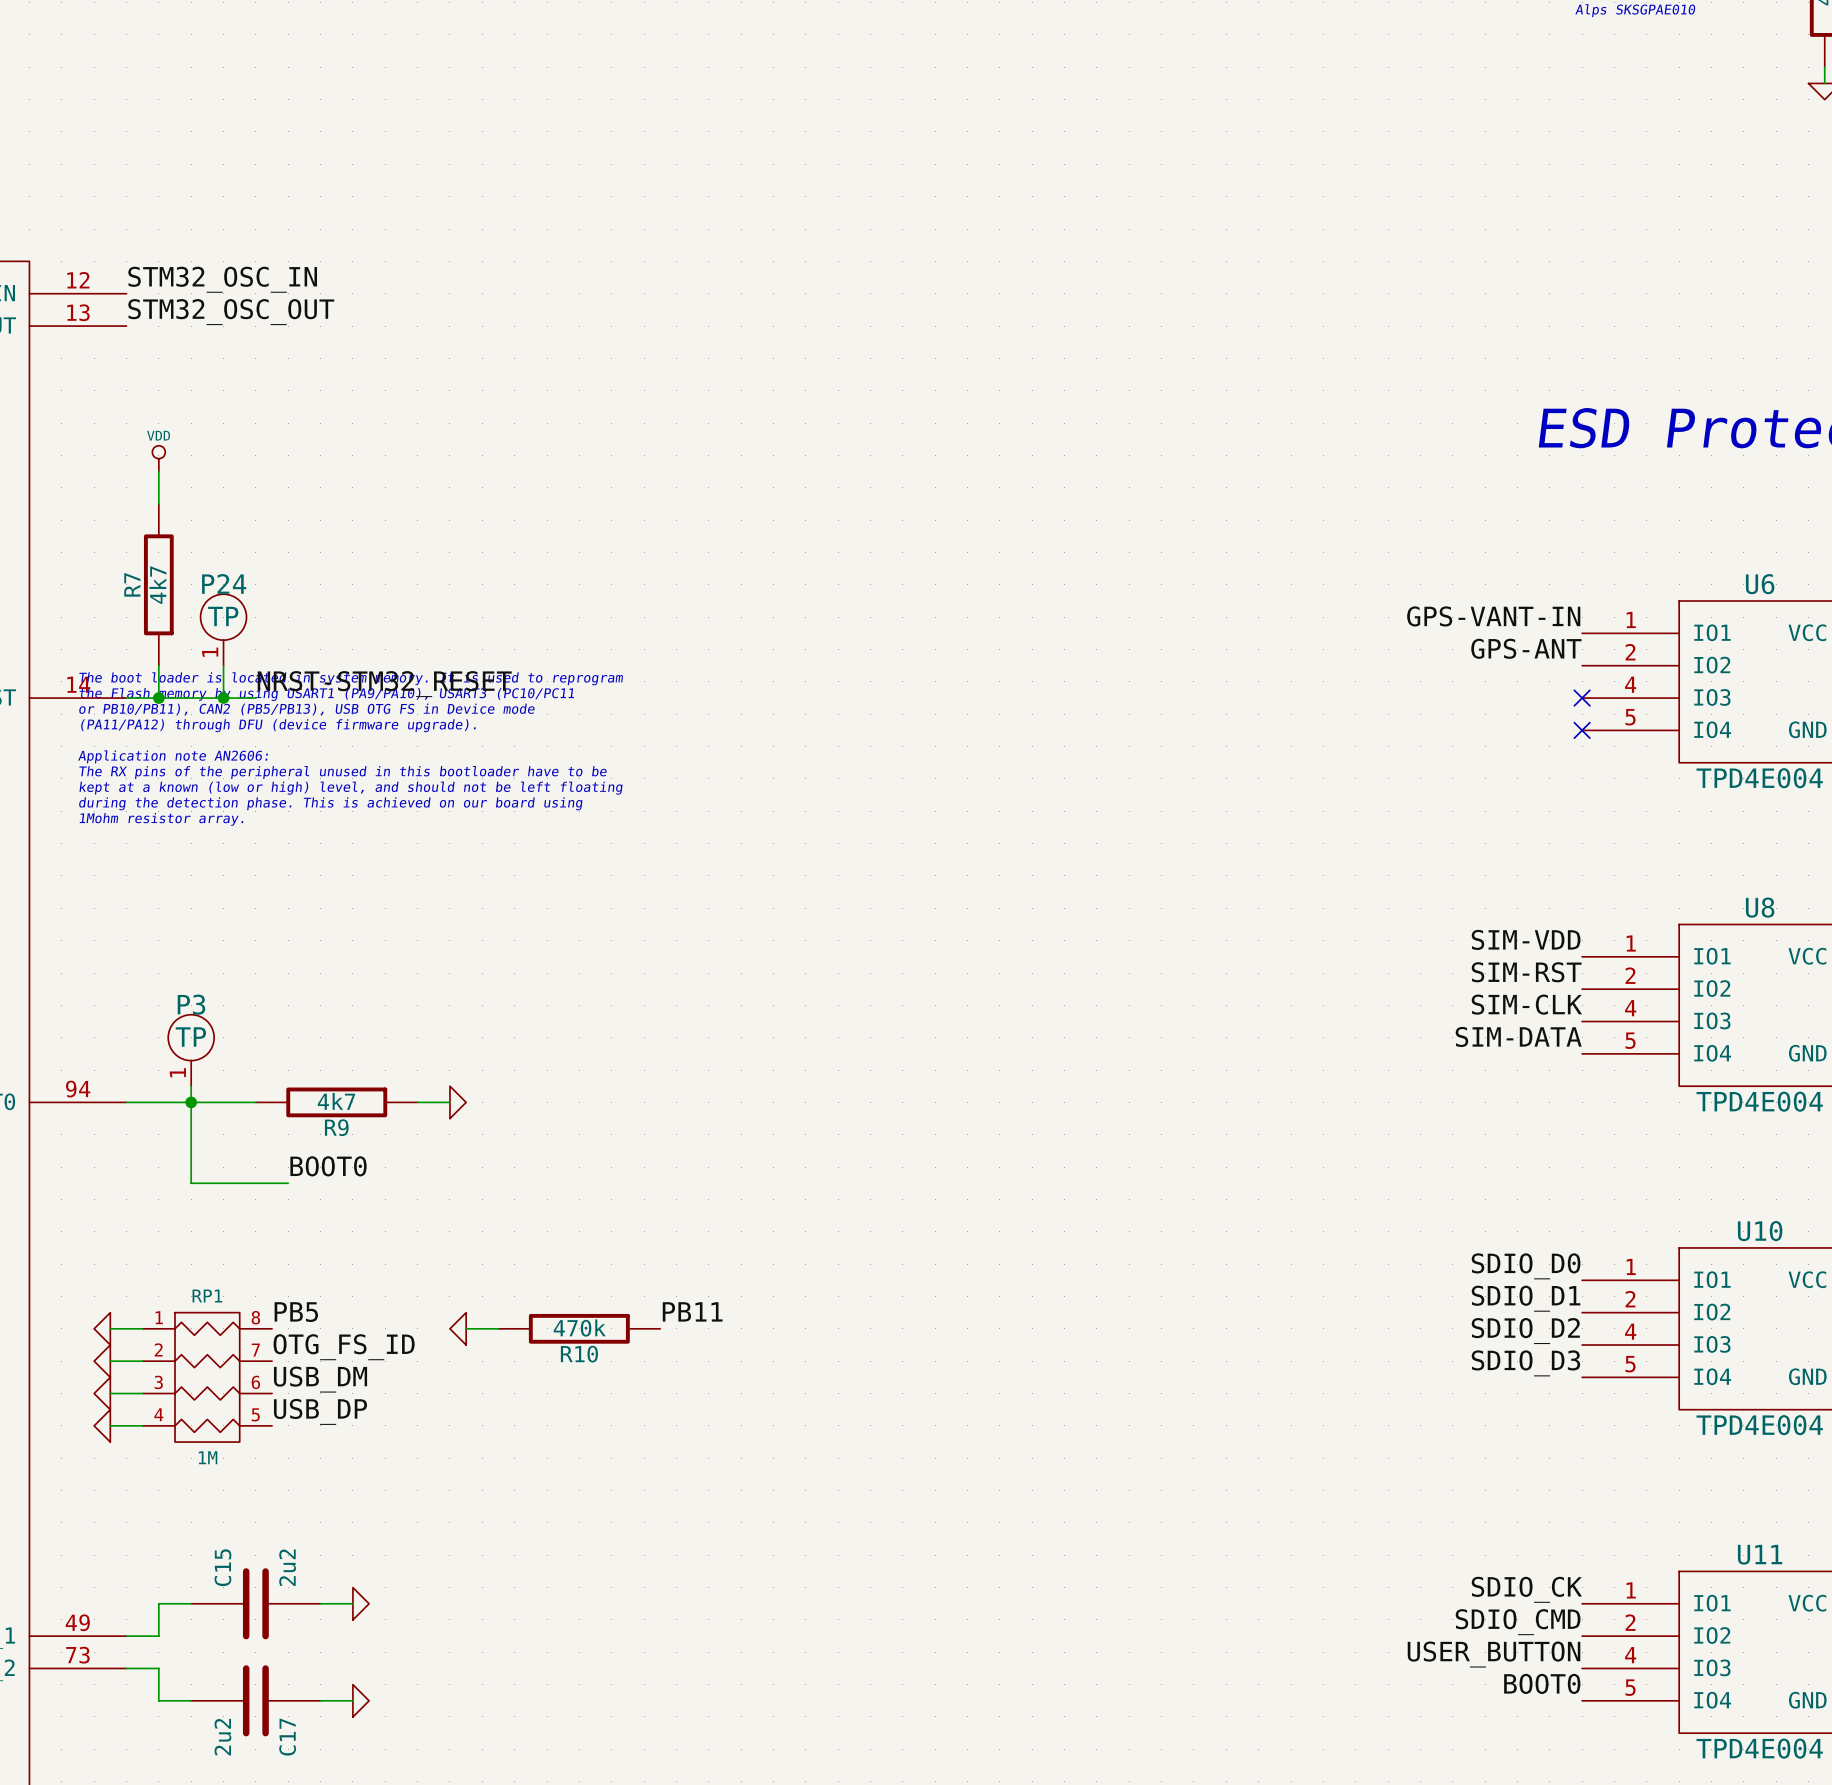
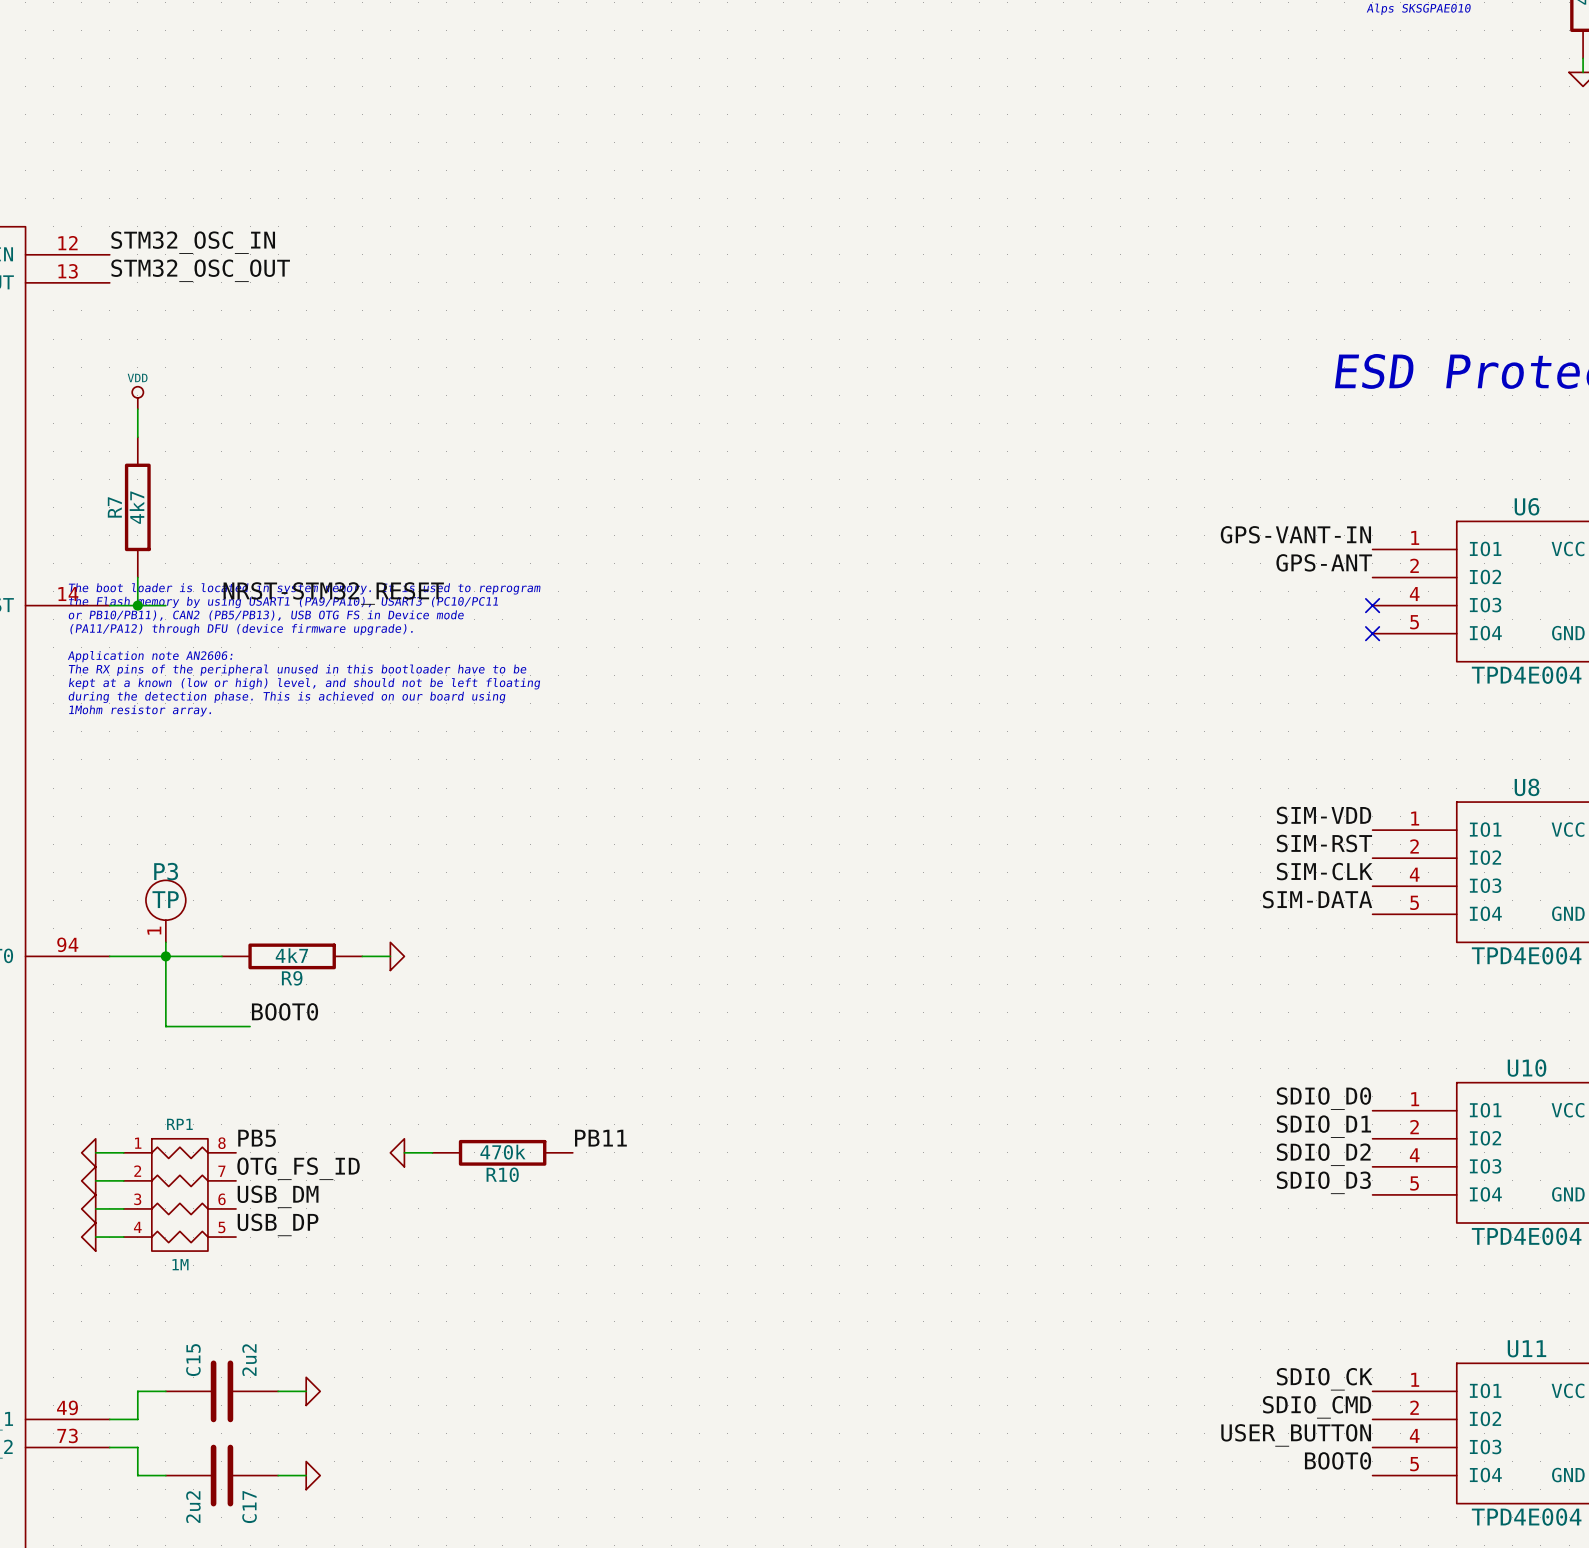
P24: TP (223, 629) -> none
wire: (223, 665) (223, 698) -> none
wire: (191, 698) (255, 698) -> none
junction: (223, 698) -> none

